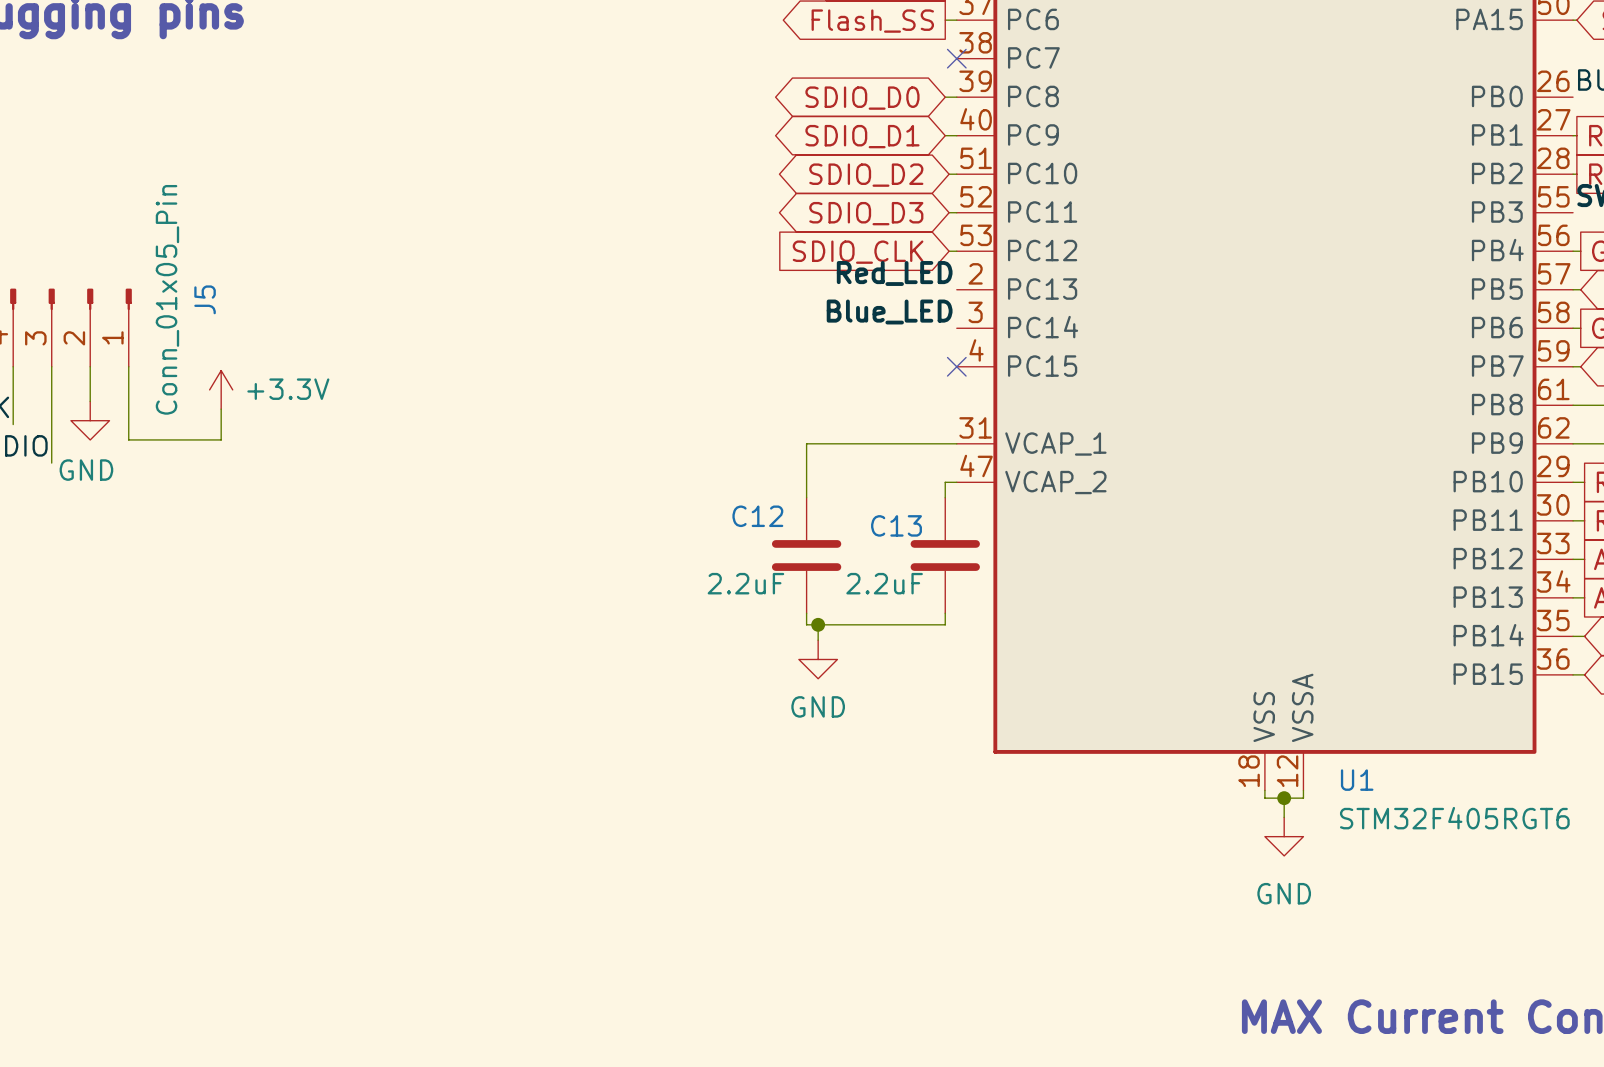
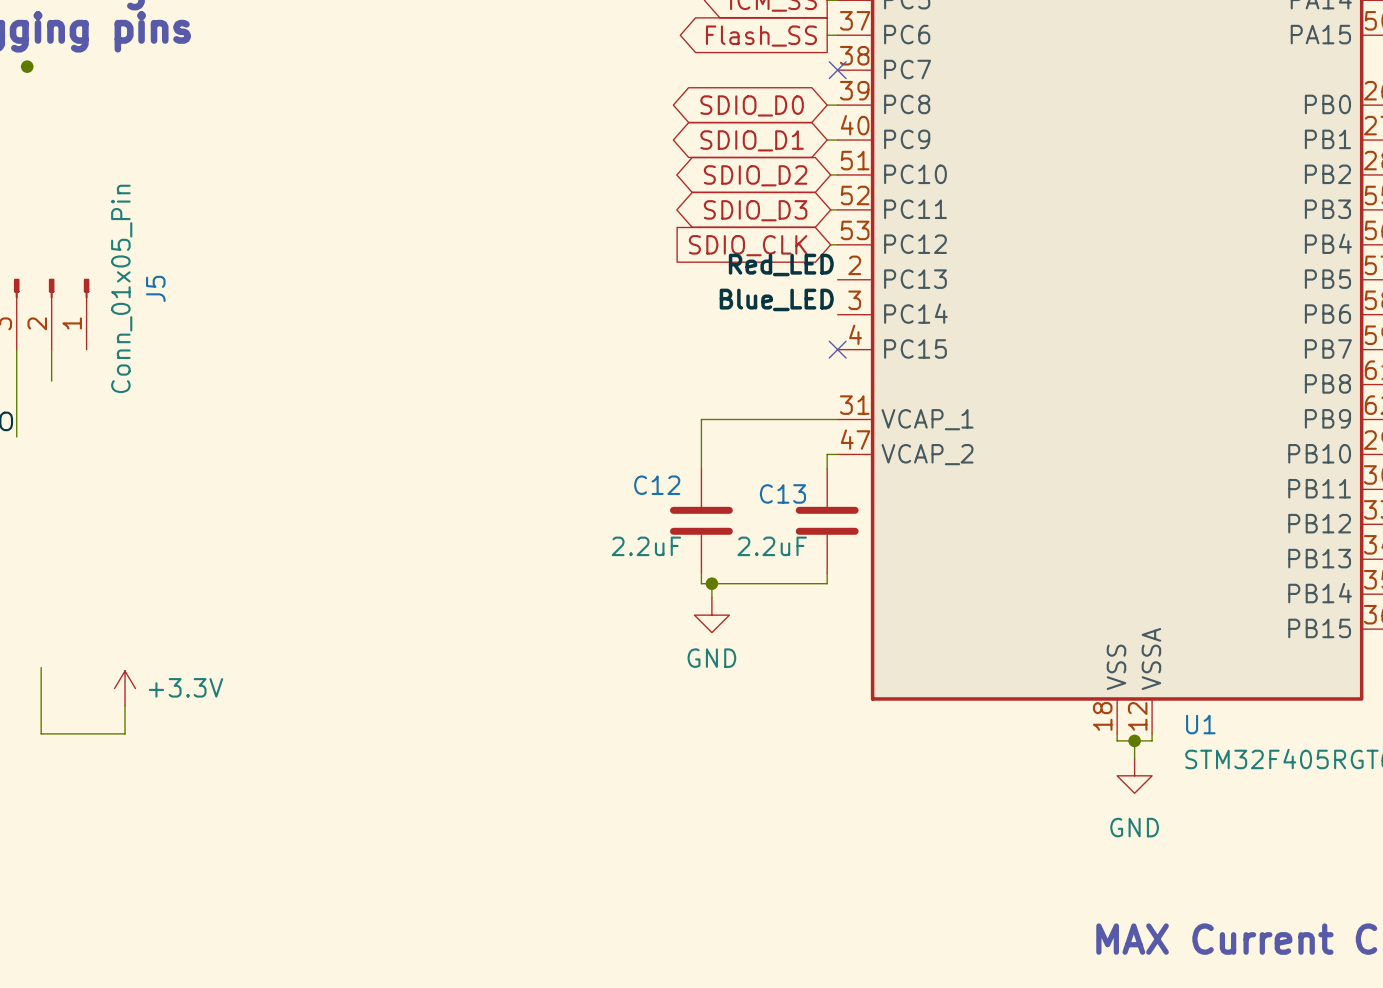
junction: none -> (27, 66)
wire: (128, 366) (128, 439) (221, 439) (221, 409) -> (41, 667) (41, 733) (125, 733) (125, 705)
power symbol: +3.3V (221, 389) -> none
power symbol: GND (90, 420) -> none
power symbol: none -> +3.3V (125, 688)

